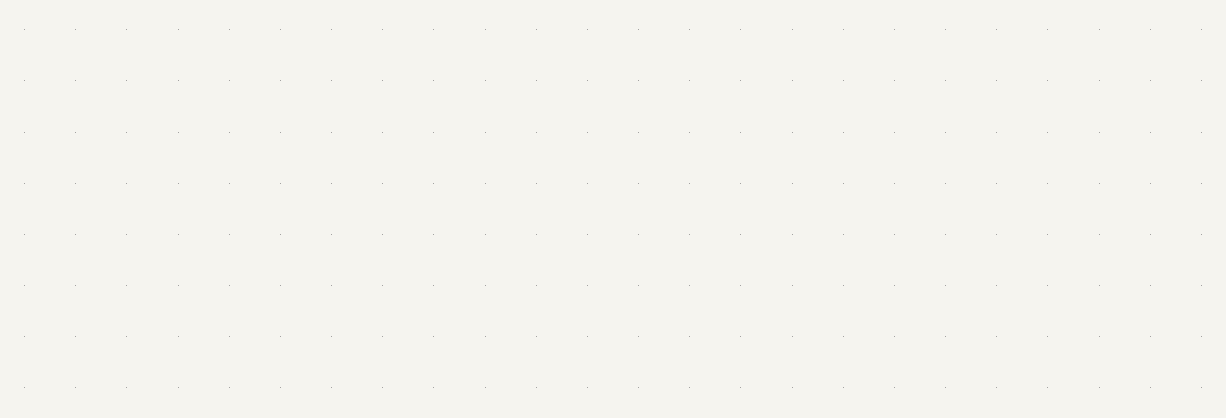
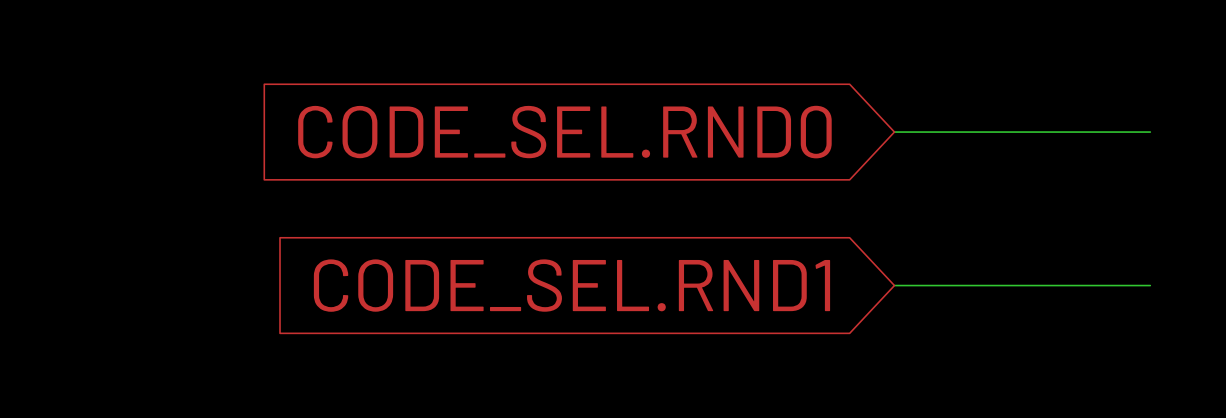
wire: none -> (894, 132) (1150, 132)
global label: none -> CODE_SEL.RND0 (564, 132)
wire: none -> (894, 285) (1150, 285)
global label: none -> CODE_SEL.RND1 (571, 285)

